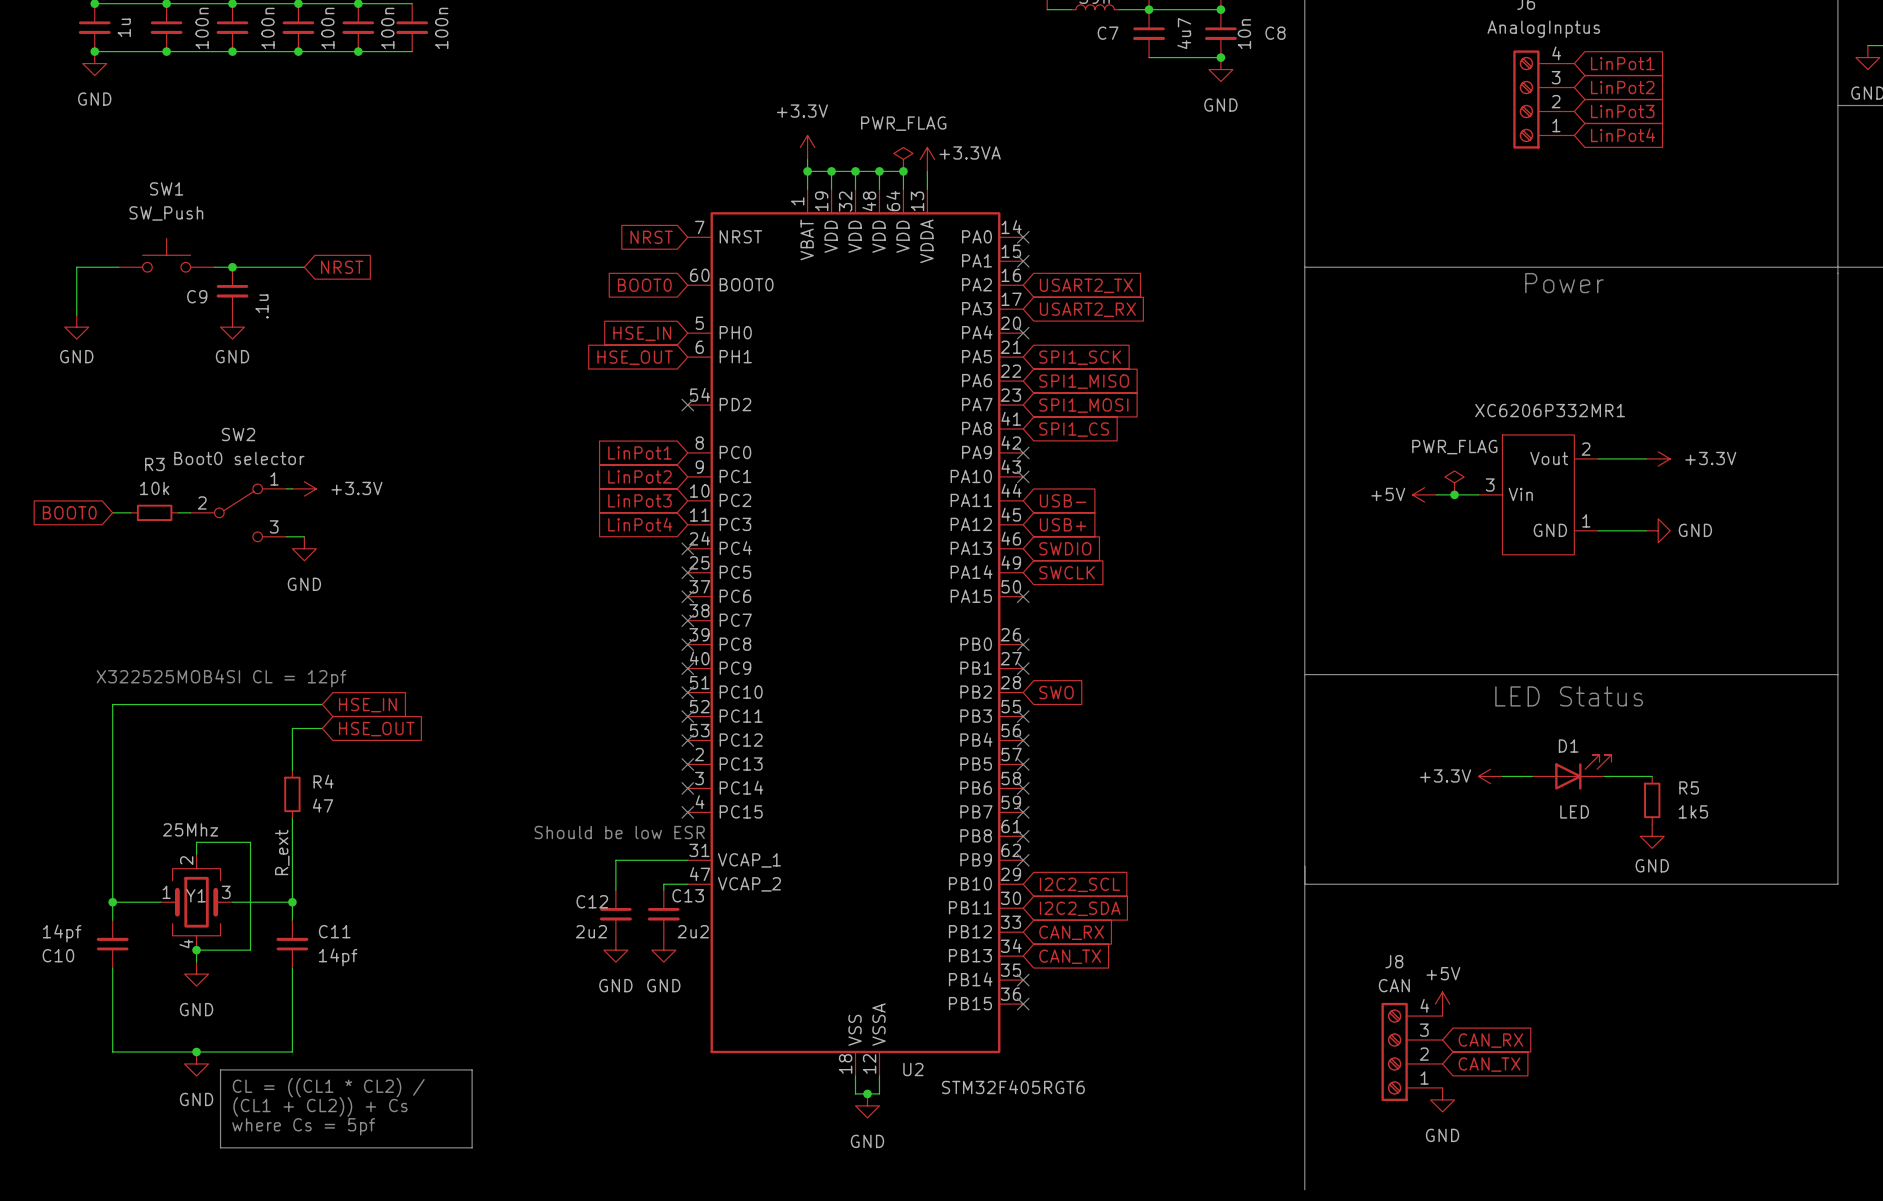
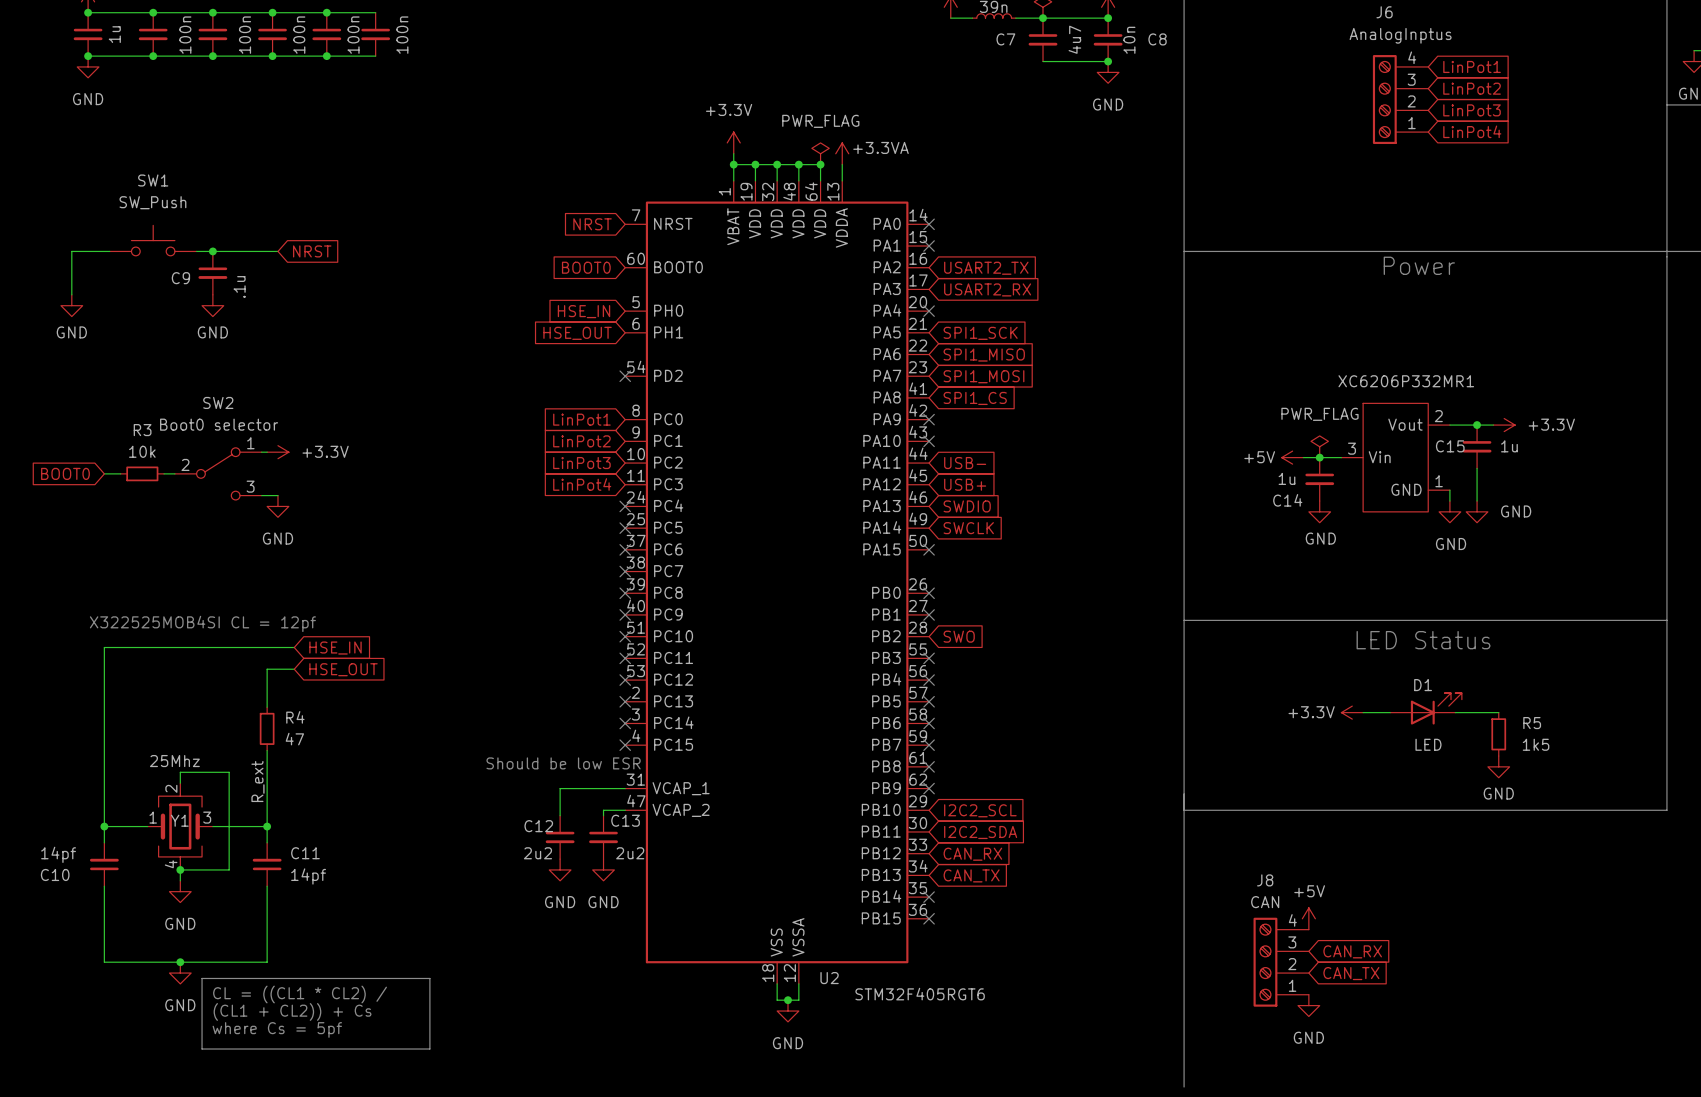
junction: none -> (1477, 425)
C15: none -> 1u (1477, 446)
wire: none -> (1477, 468) (1477, 501)
C14: none -> 1u (1319, 479)
wire: (1598, 530) (1646, 530) -> (1449, 490) (1449, 501)
power symbol: GND (1658, 530) -> none
power symbol: none -> GND (1319, 511)
power symbol: none -> GND (1449, 511)
power symbol: none -> GND (1477, 511)

